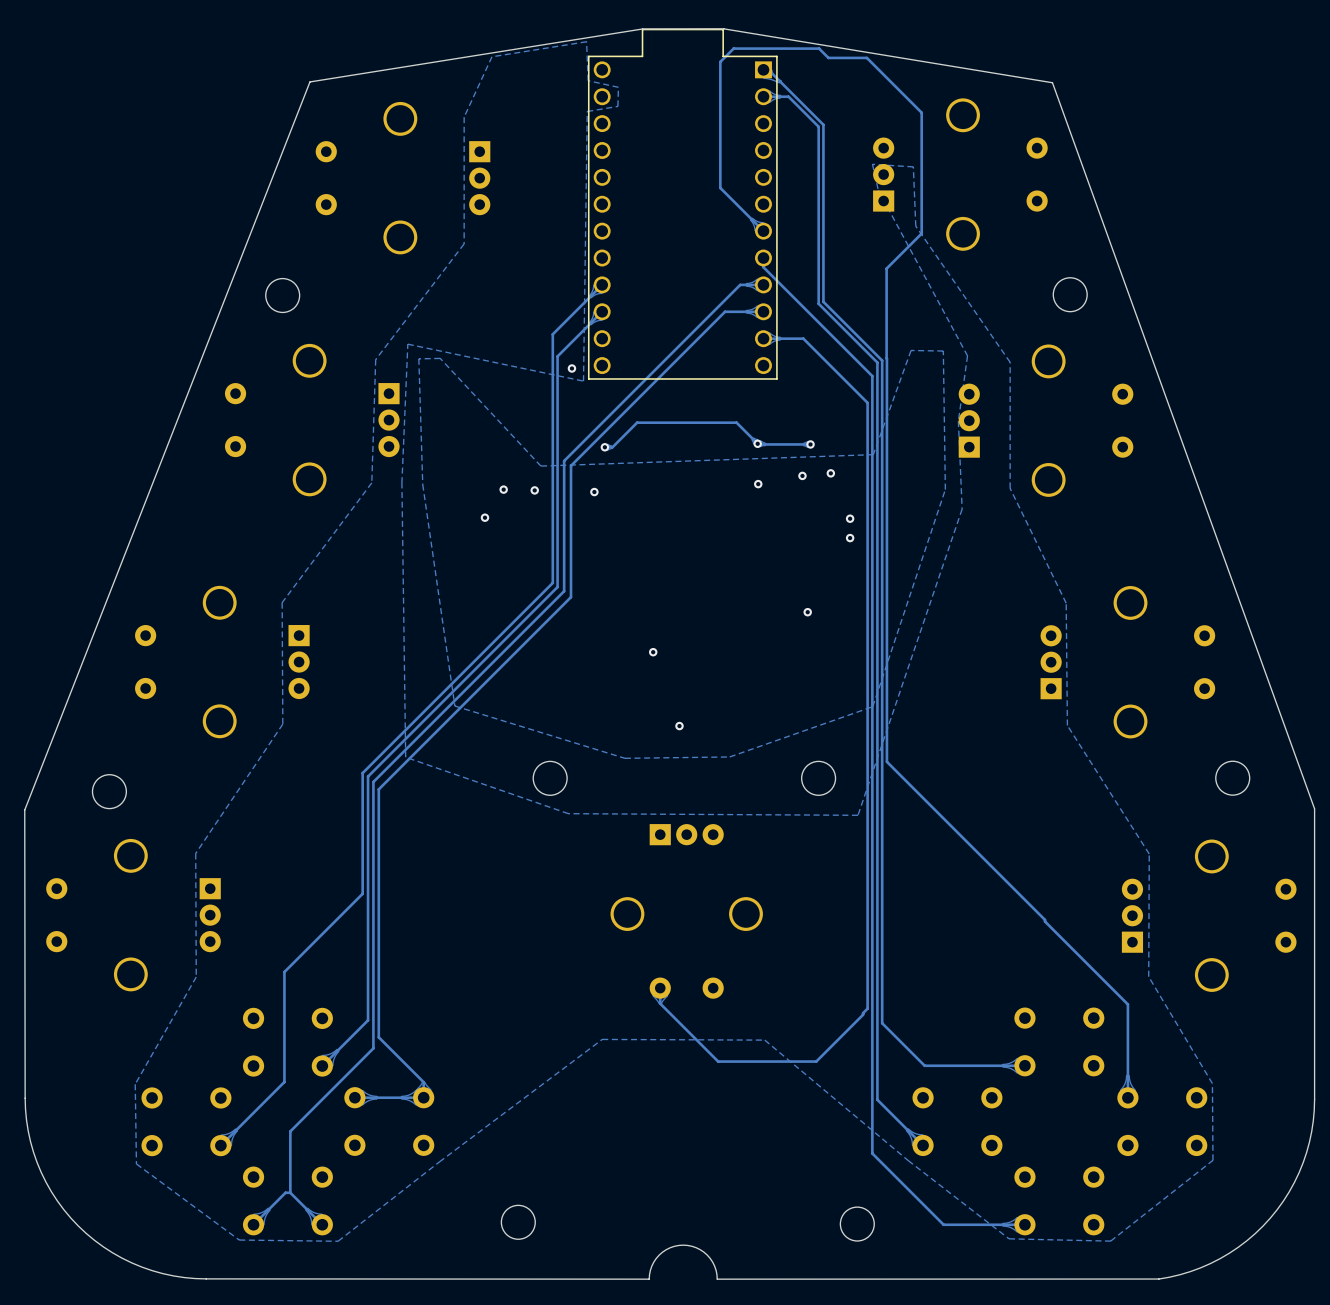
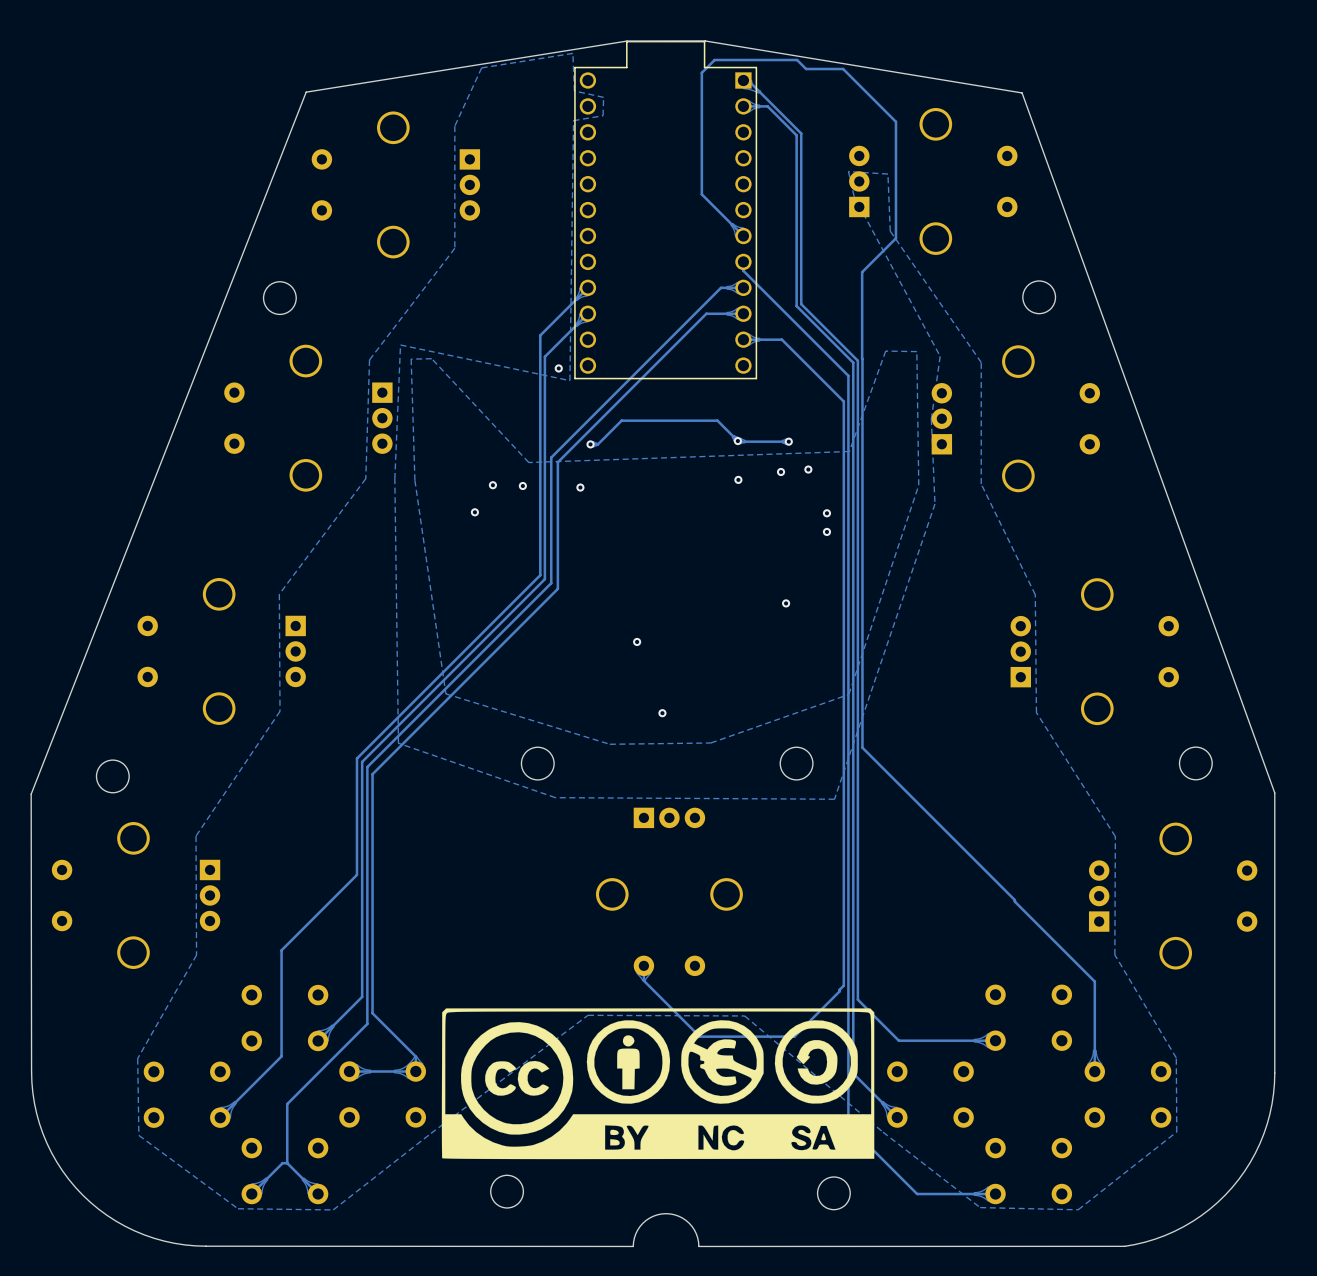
drawing: none -> [441, 1008, 875, 1160]

